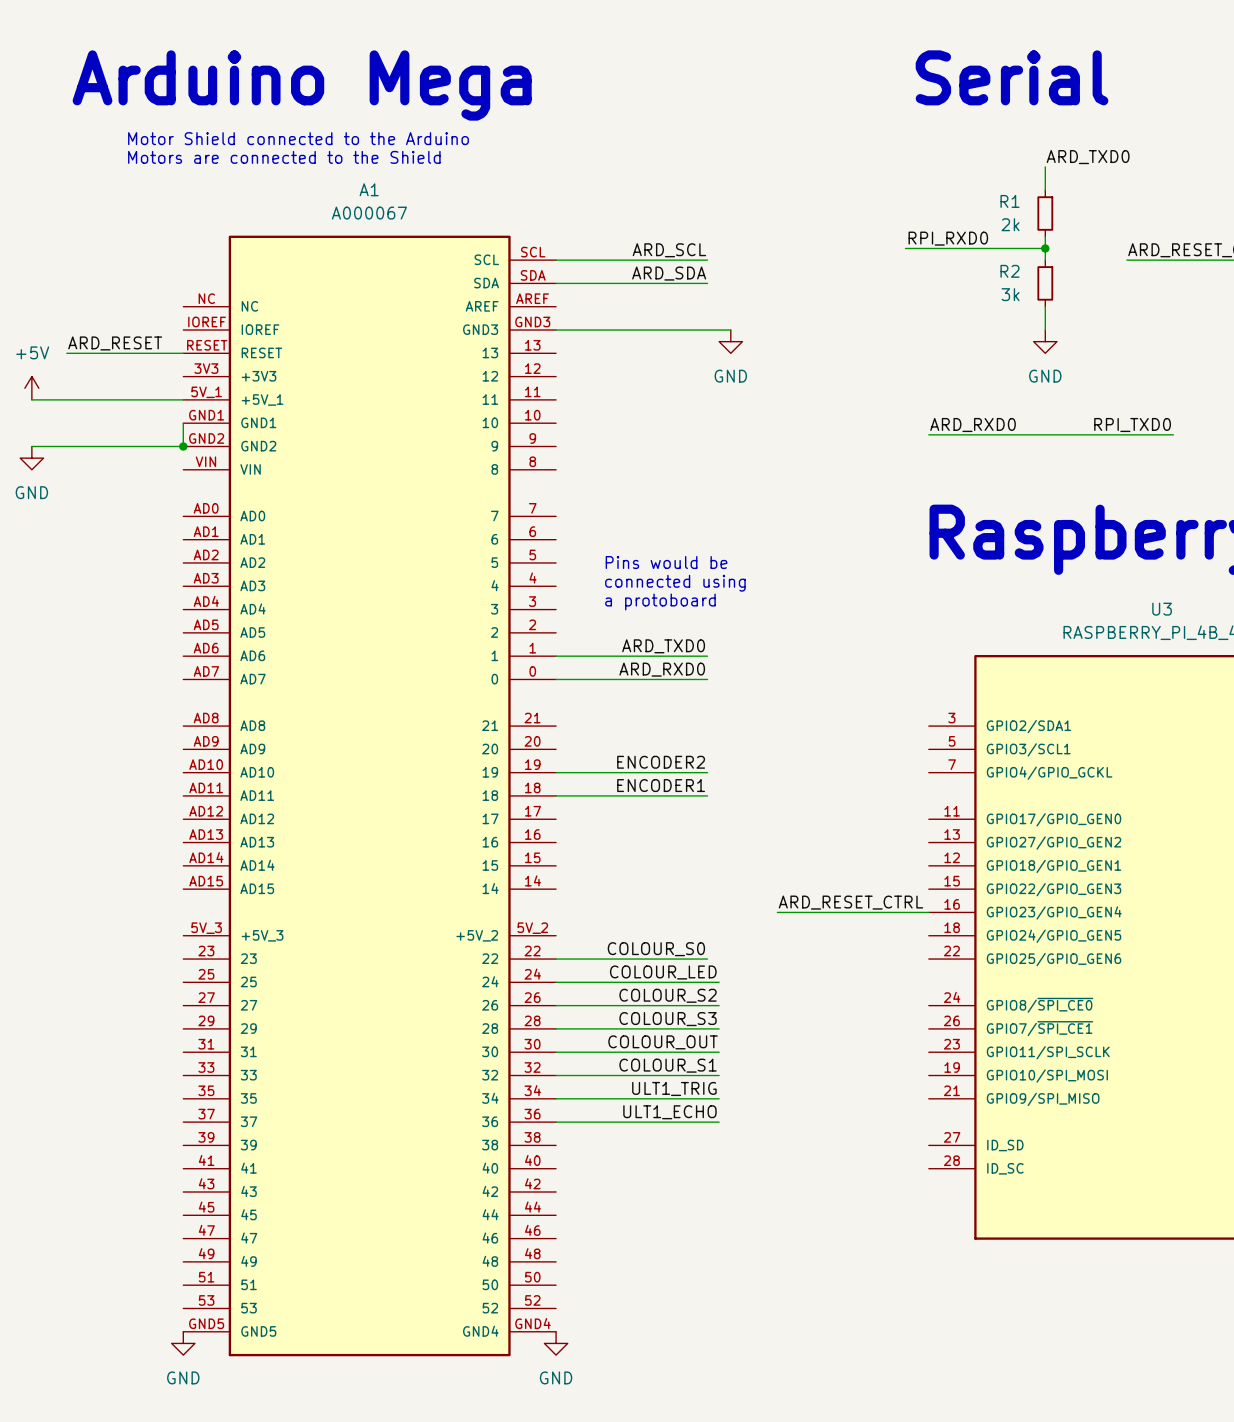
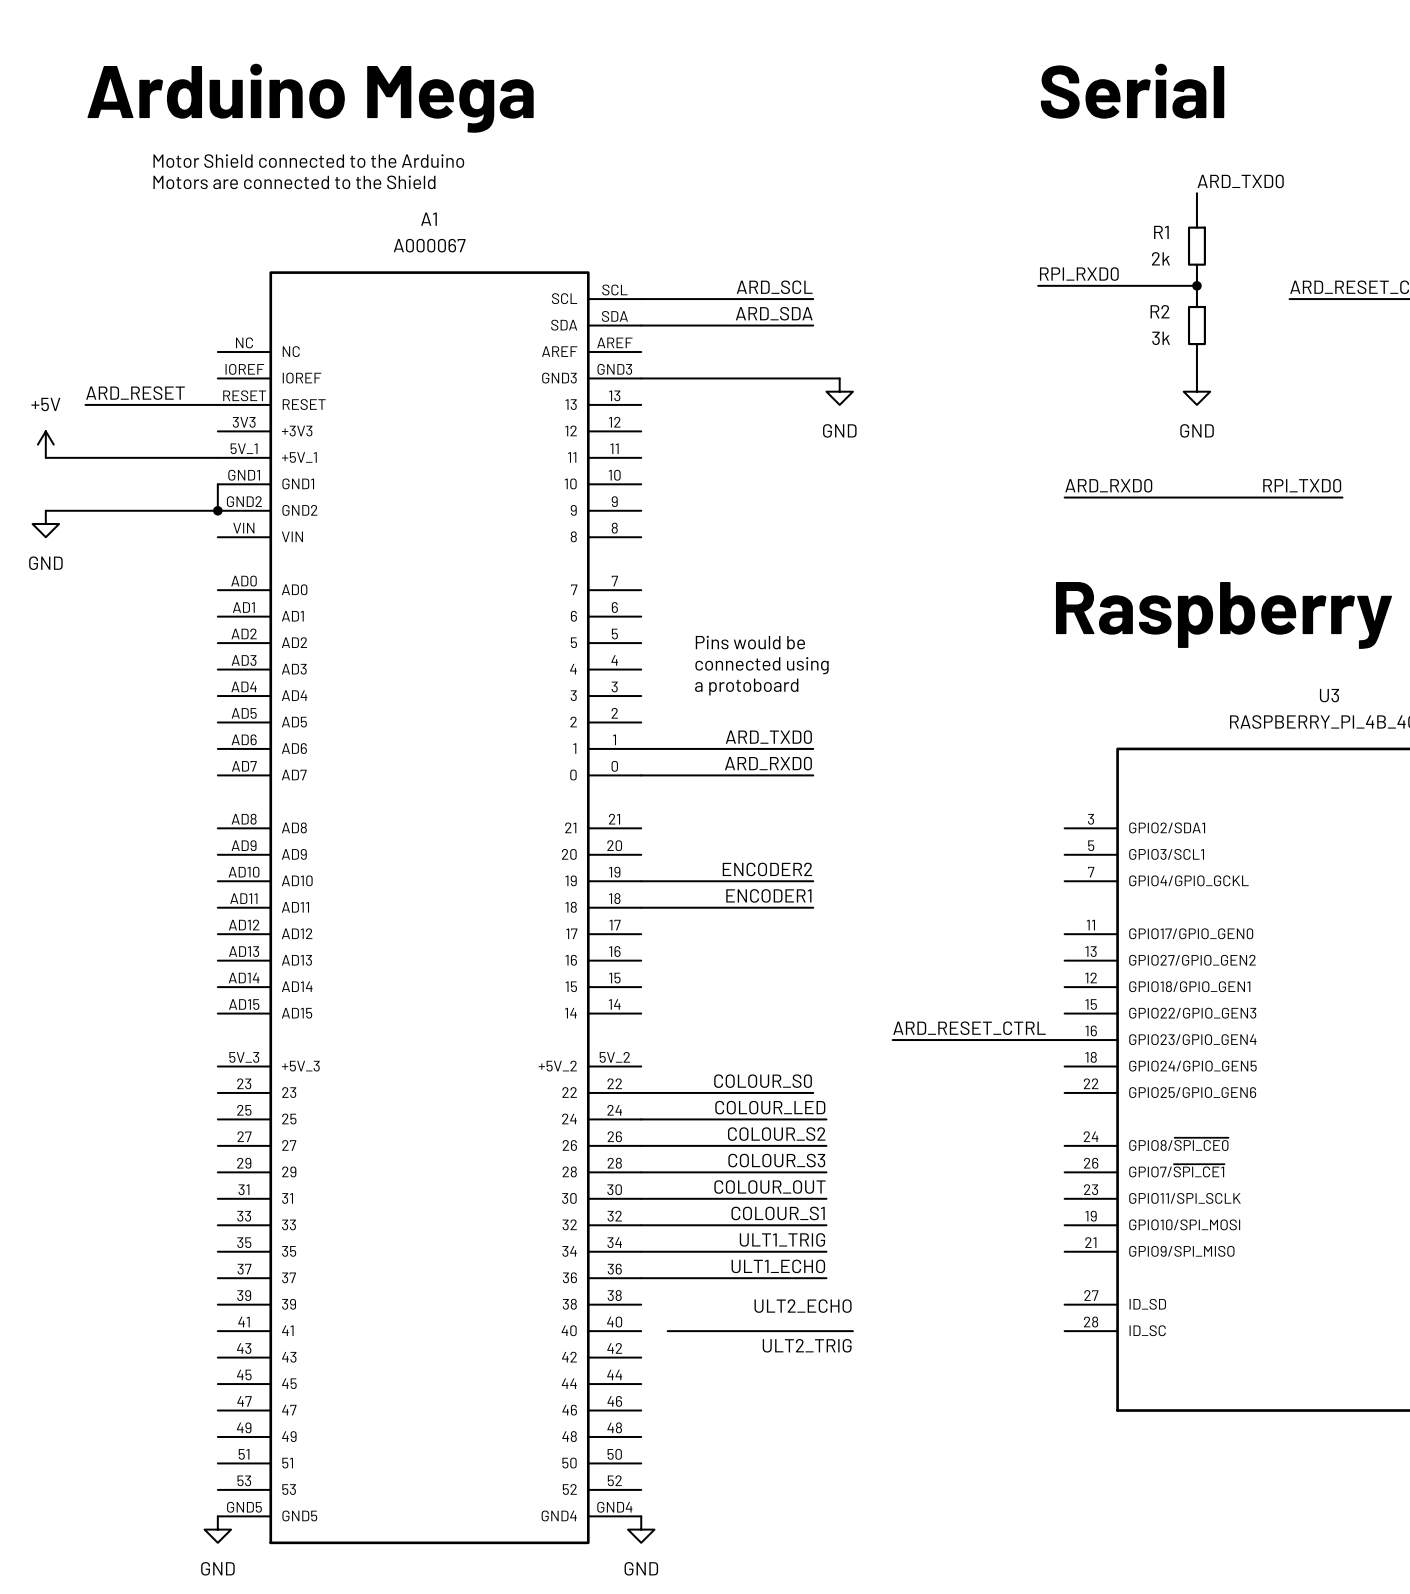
label: none -> ULT2_ECHO (803, 1306)
wire: none -> (667, 1331) (852, 1331)
label: none -> ULT2_TRIG (807, 1345)

